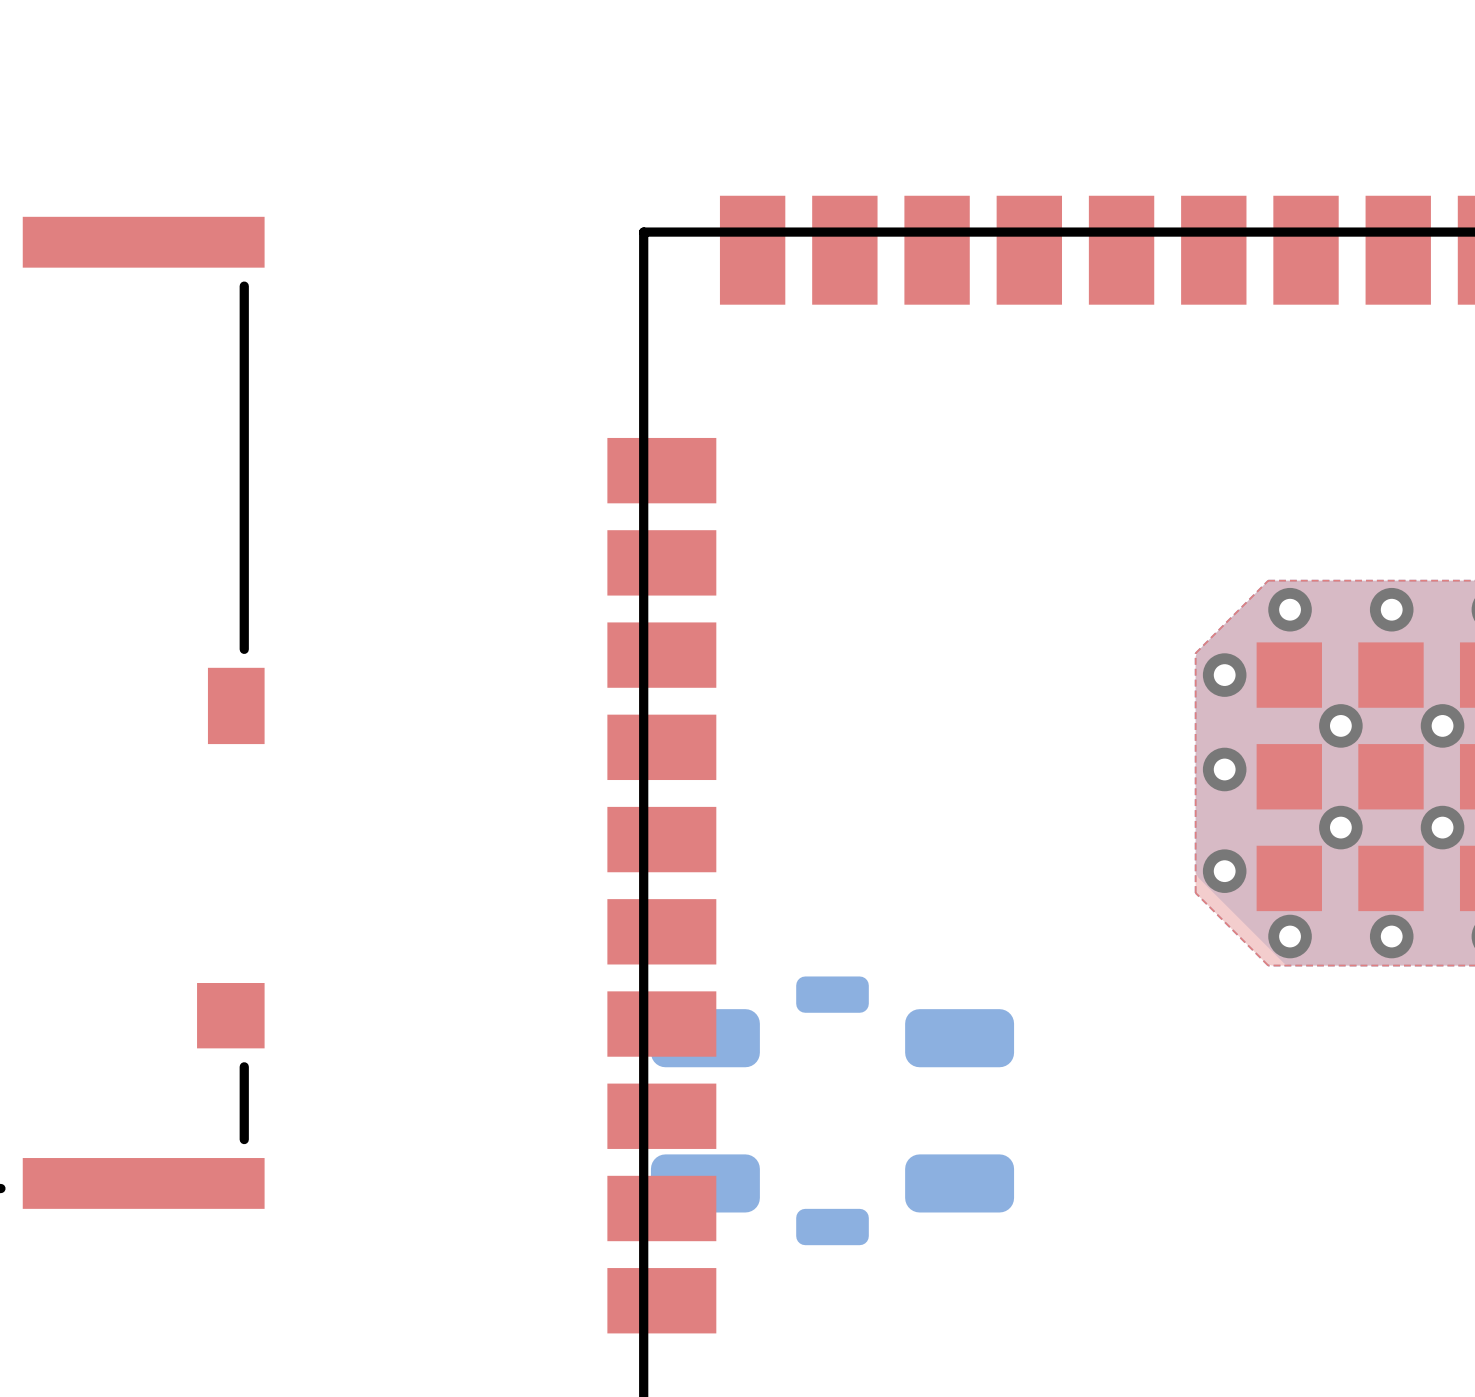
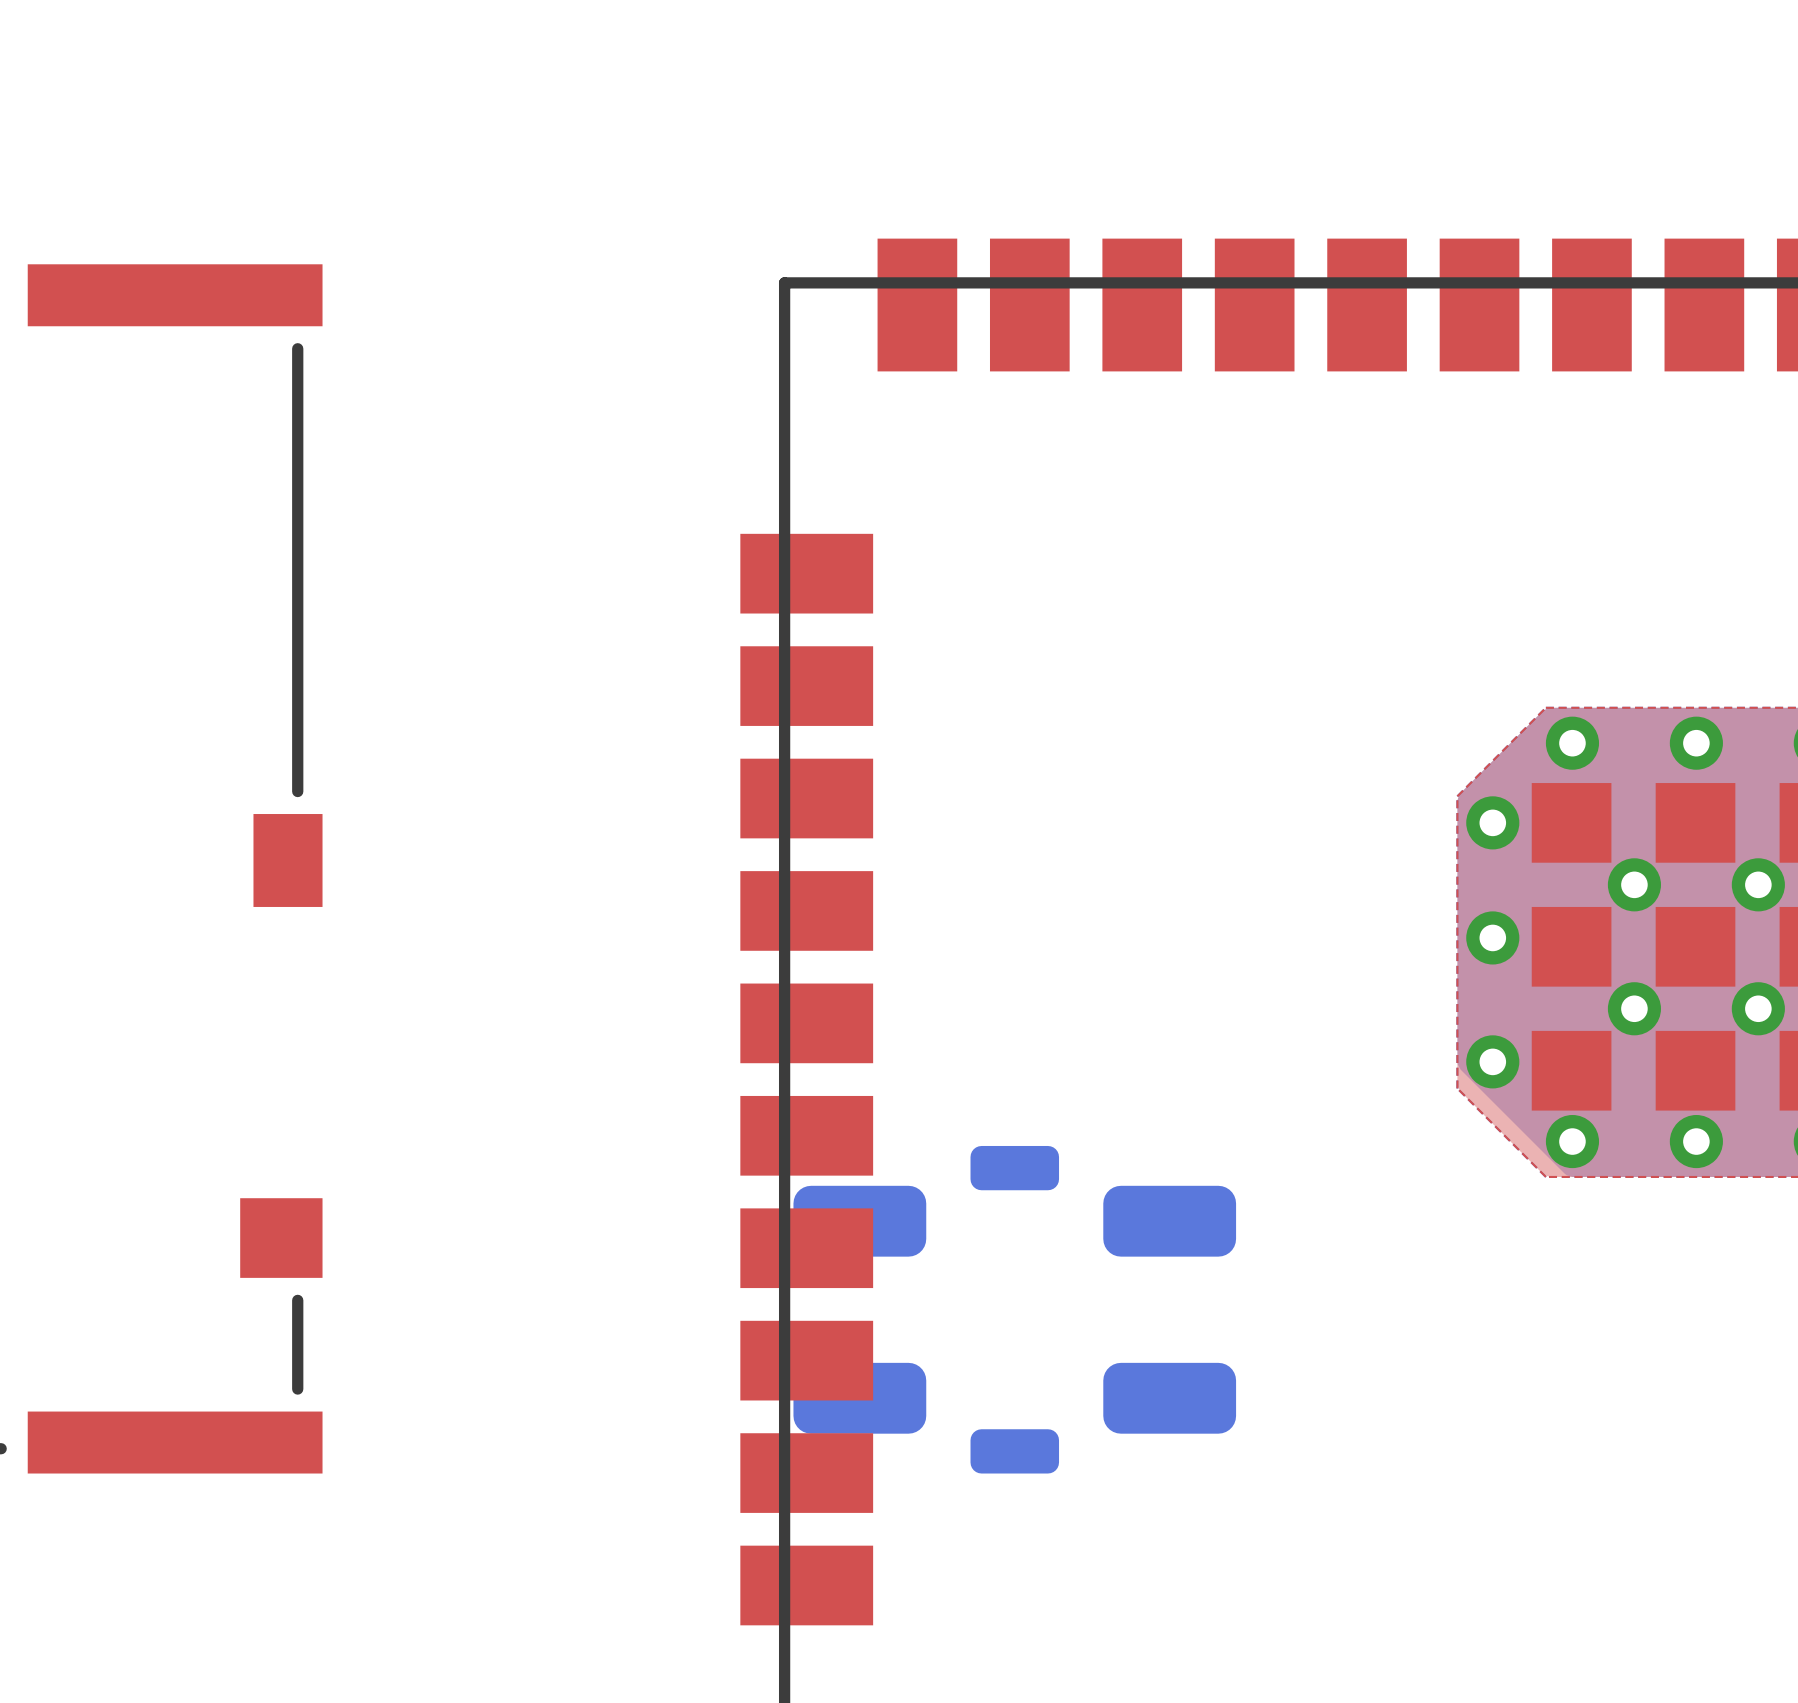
part position: (832, 1110) -> (1014, 1309)

